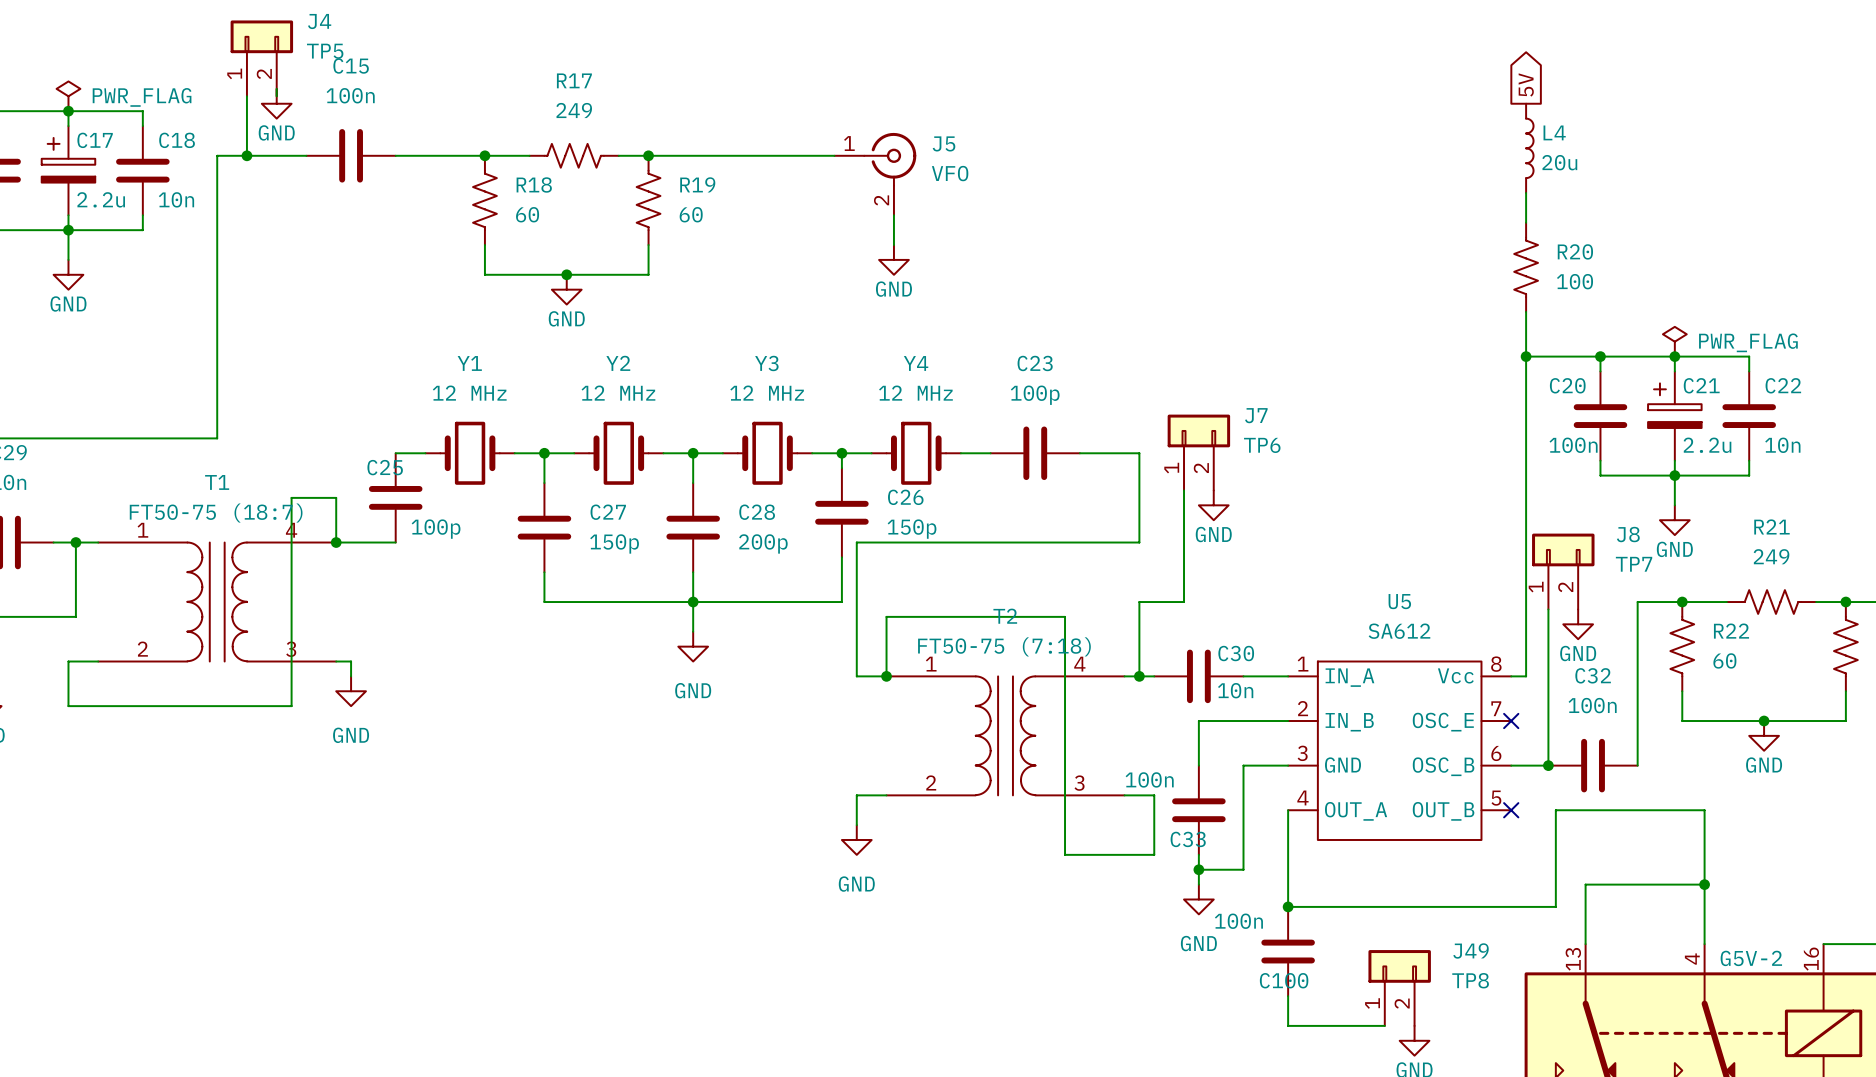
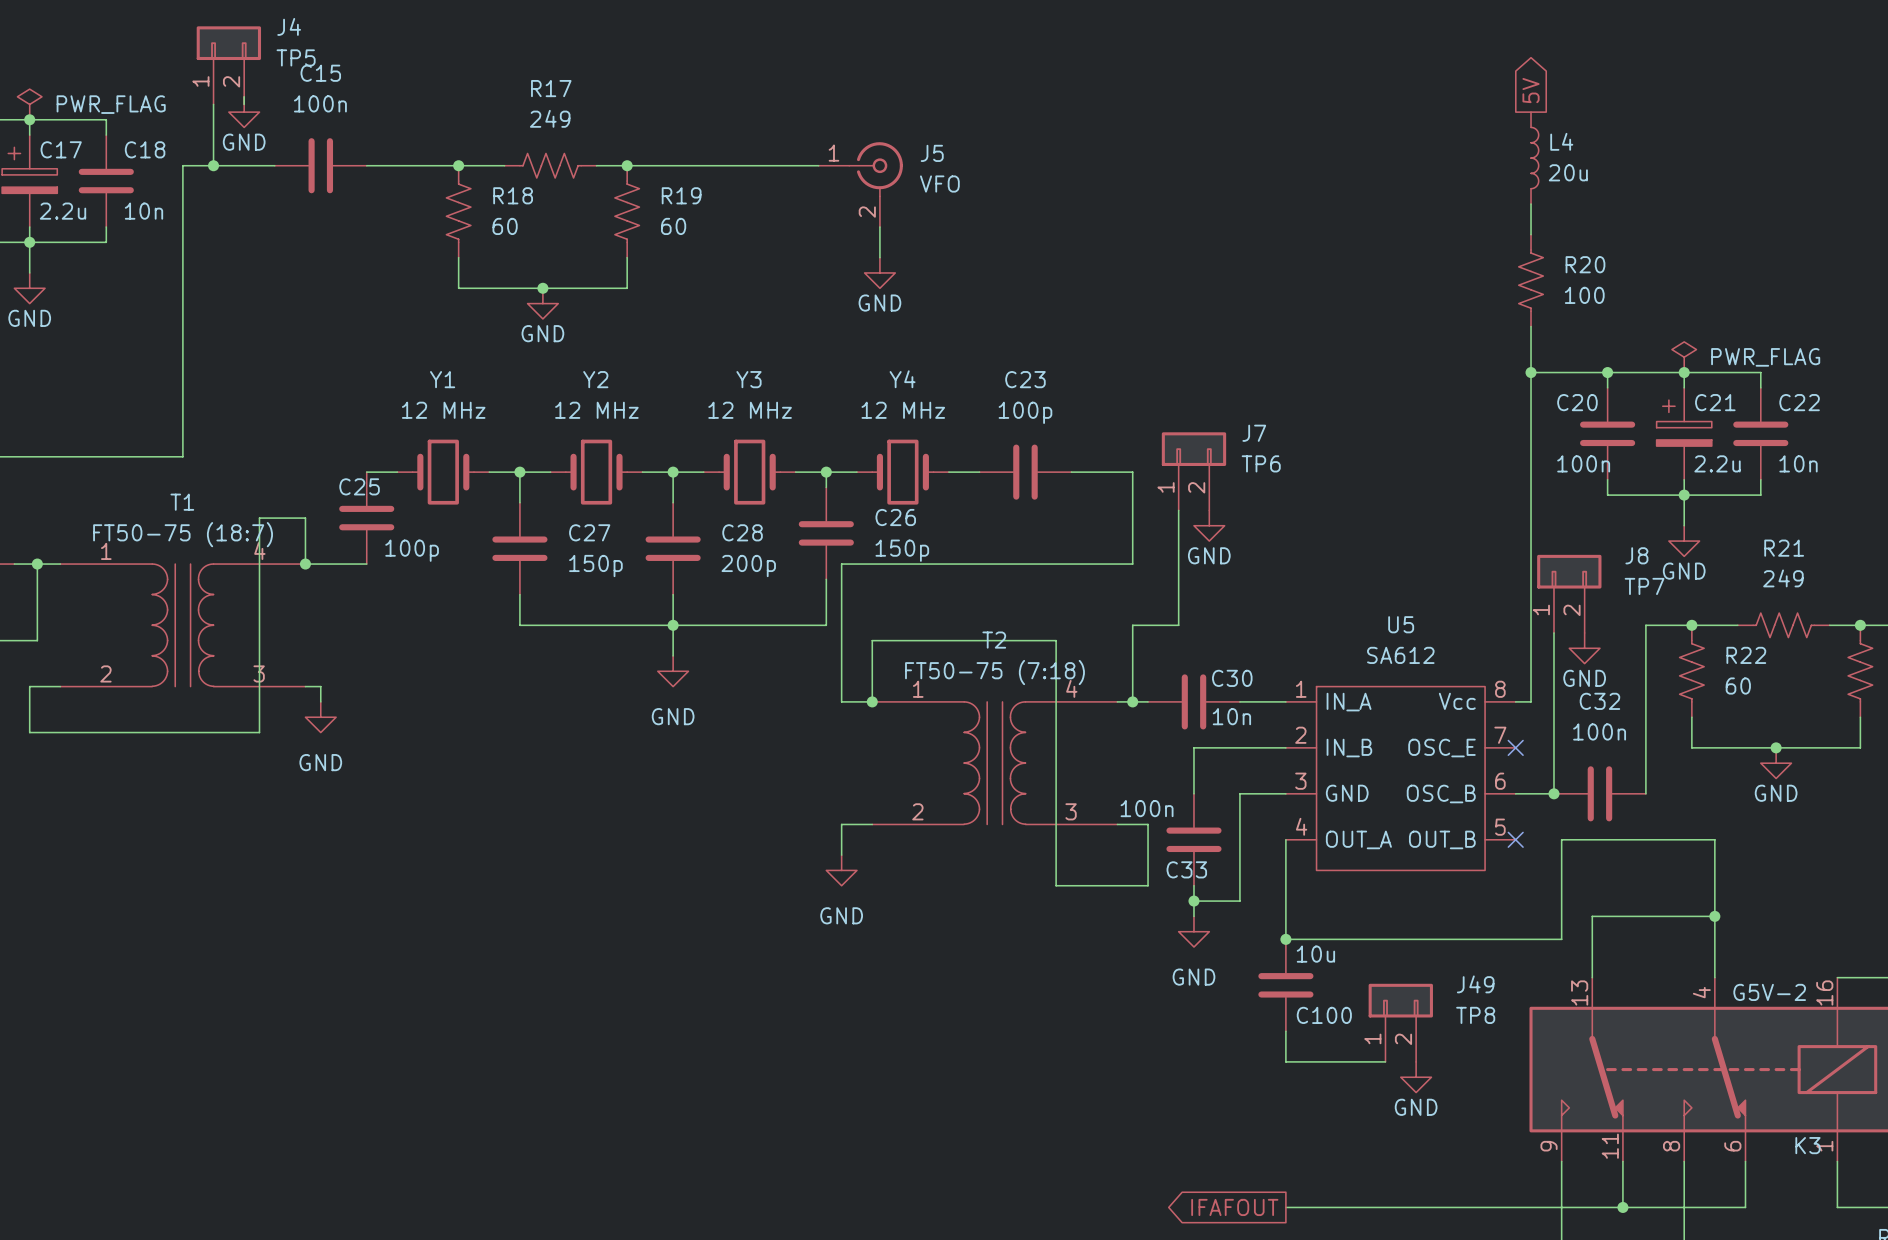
C100 value: 100n (1238, 921) -> 10u (1315, 954)
C100 name position: C100 (1284, 980) -> C100 (1324, 1015)

